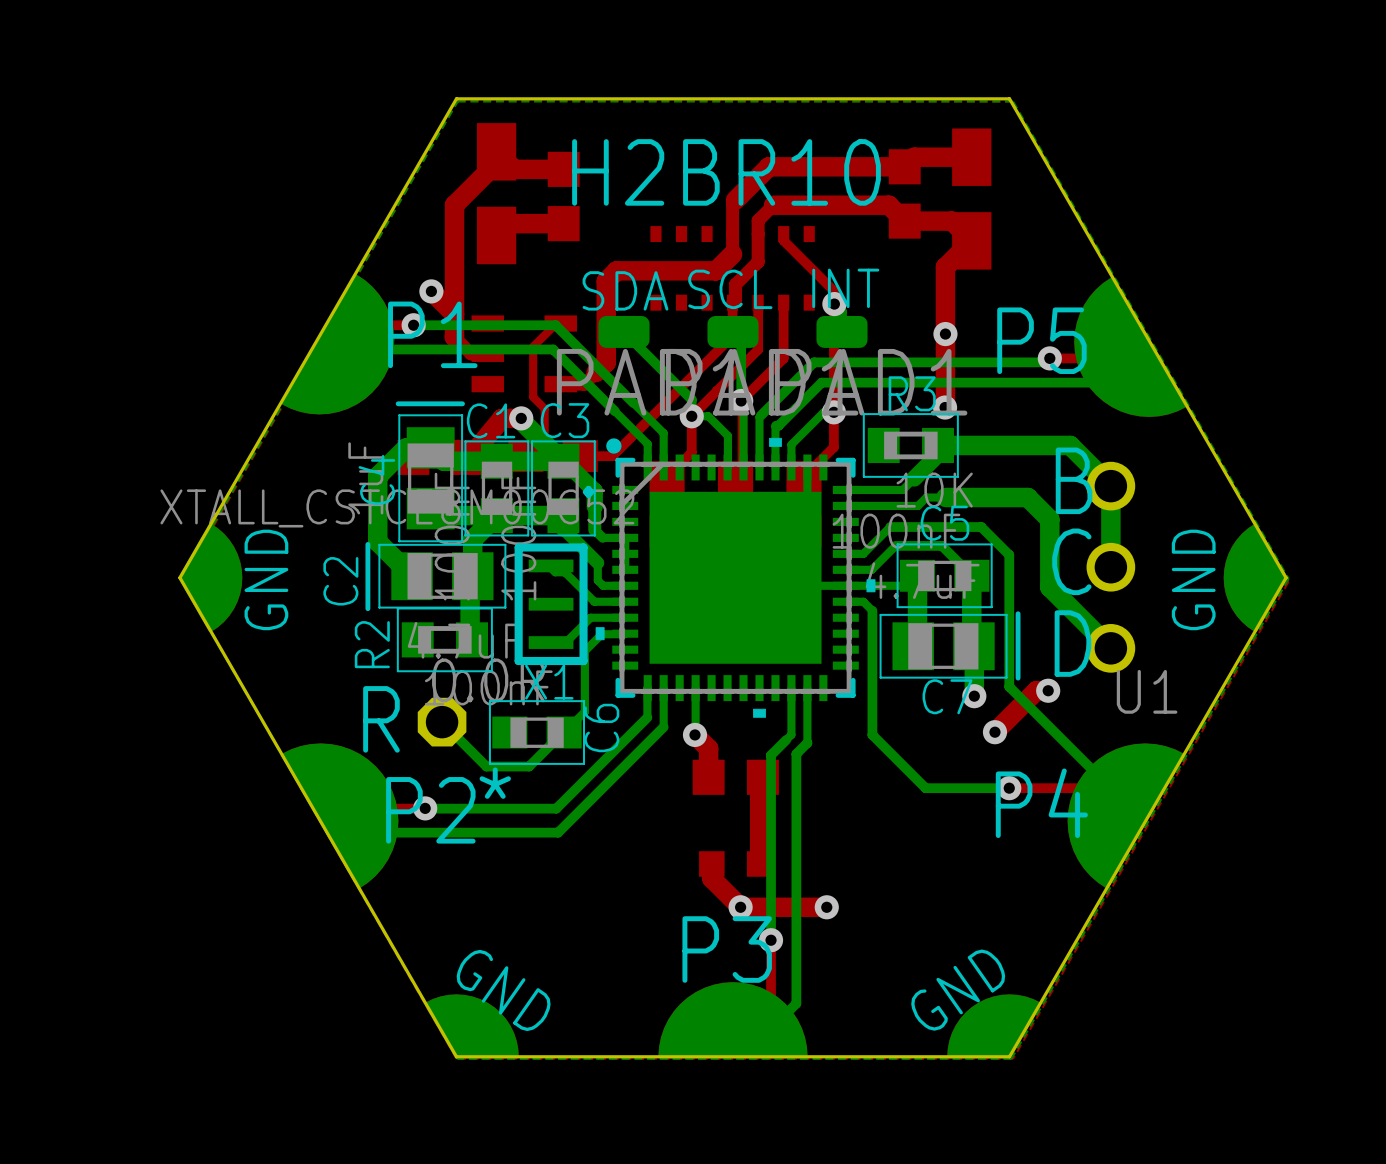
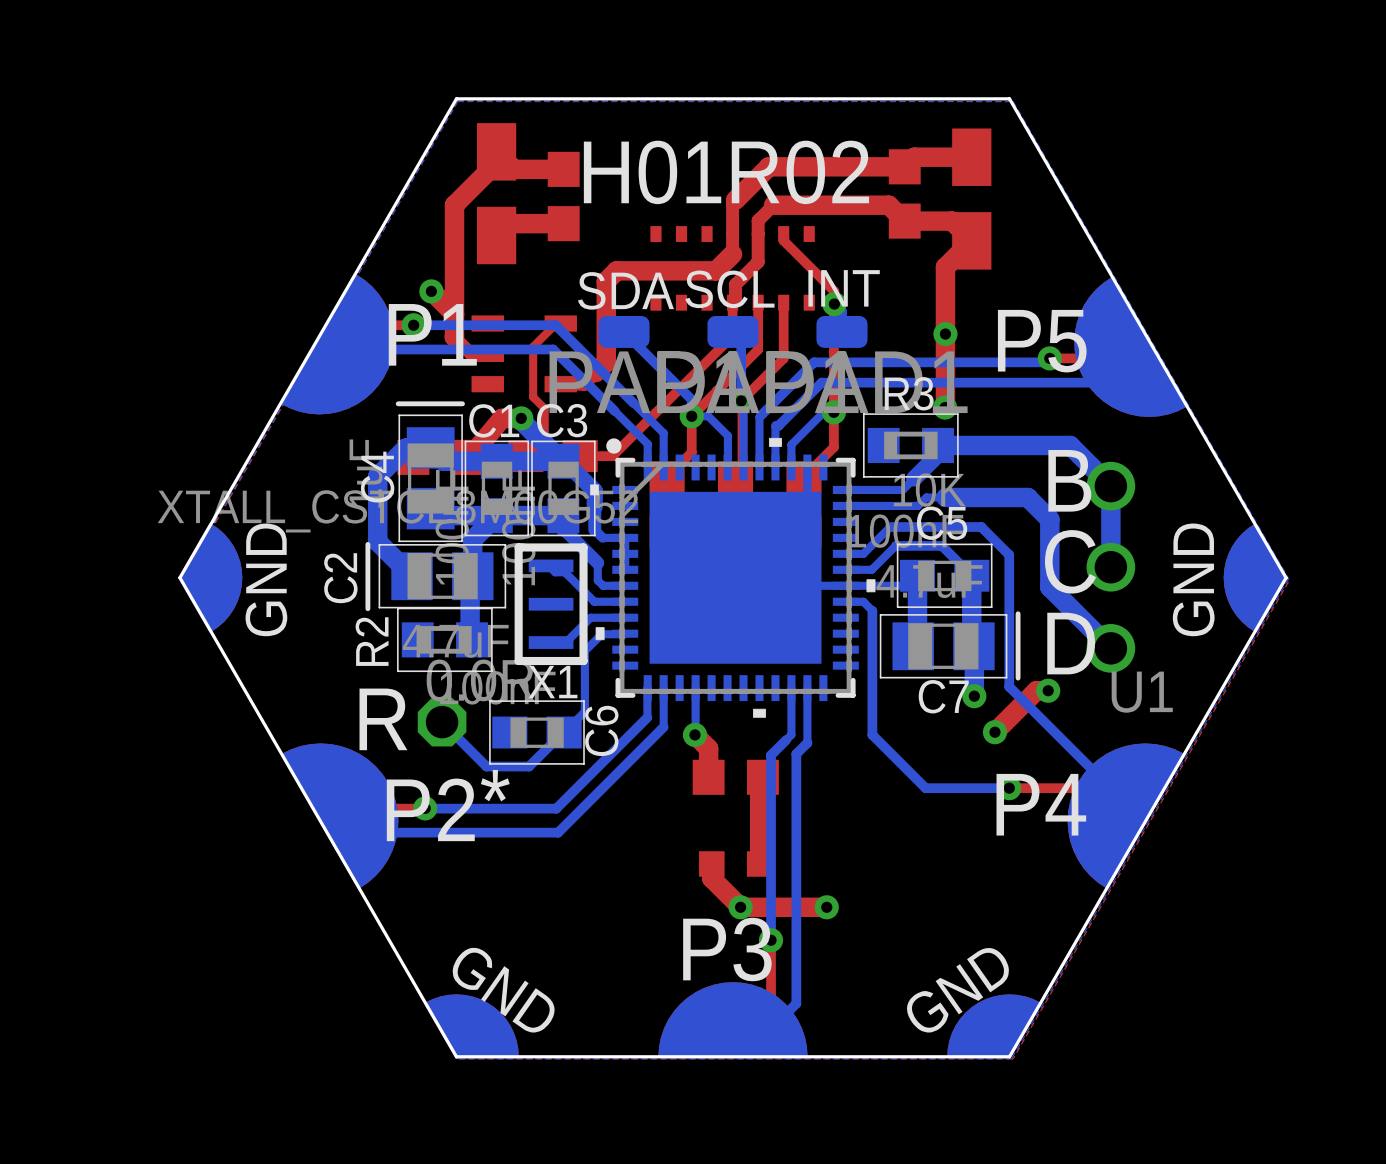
text: H2BR10 (726, 172) -> H01R02 (726, 172)

